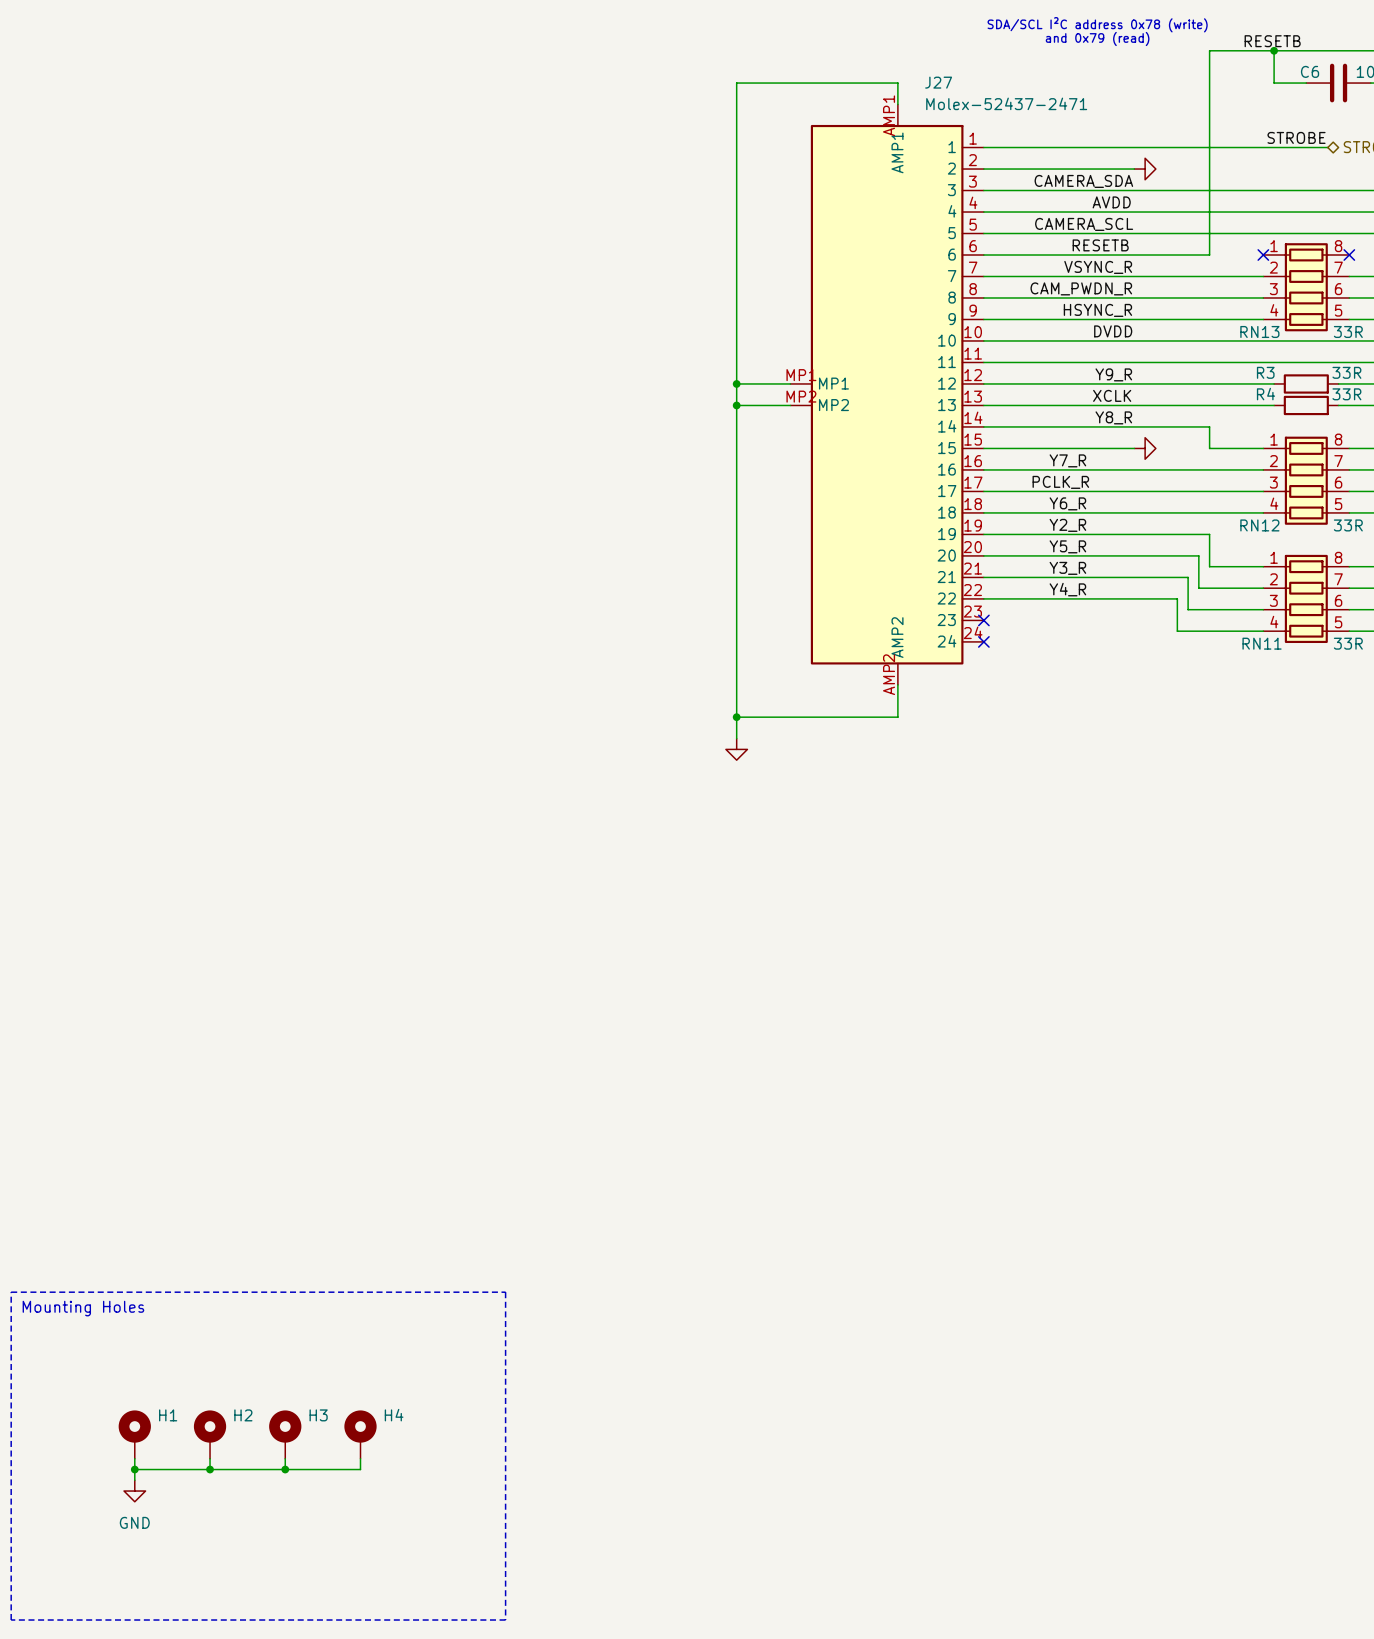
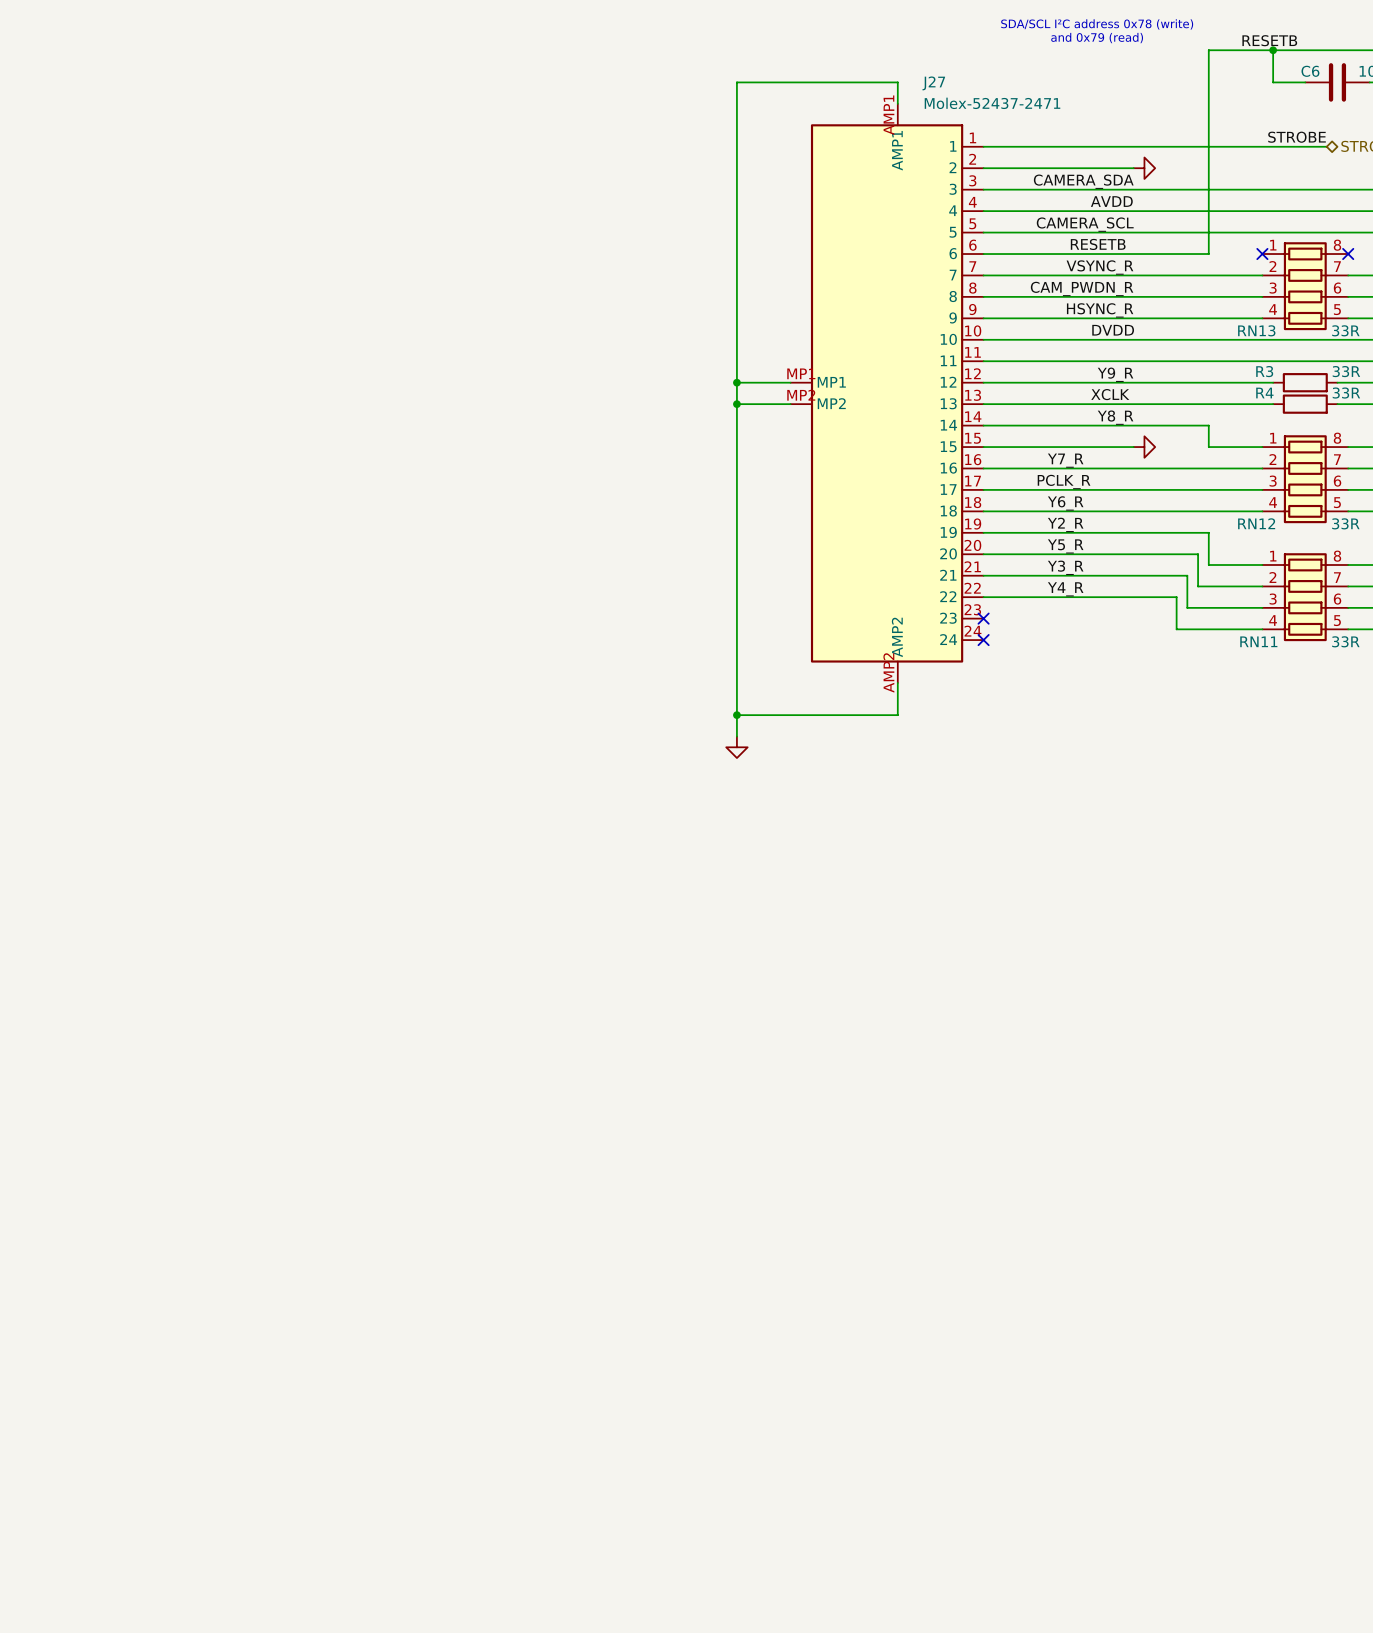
line: (11, 1292) (505, 1292) (505, 1620) (11, 1620) (11, 1292) -> none
text: Mounting Holes (83, 1308) -> none
H1: (134, 1434) -> none
H2: (210, 1434) -> none
H3: (285, 1434) -> none
H4: (360, 1434) -> none
wire: (134, 1458) (134, 1480) -> none
wire: (210, 1458) (210, 1469) -> none
wire: (285, 1458) (285, 1469) -> none
wire: (360, 1458) (360, 1469) (134, 1469) -> none
junction: (134, 1469) -> none
junction: (210, 1469) -> none
junction: (285, 1469) -> none
power symbol: GND (134, 1491) -> none

